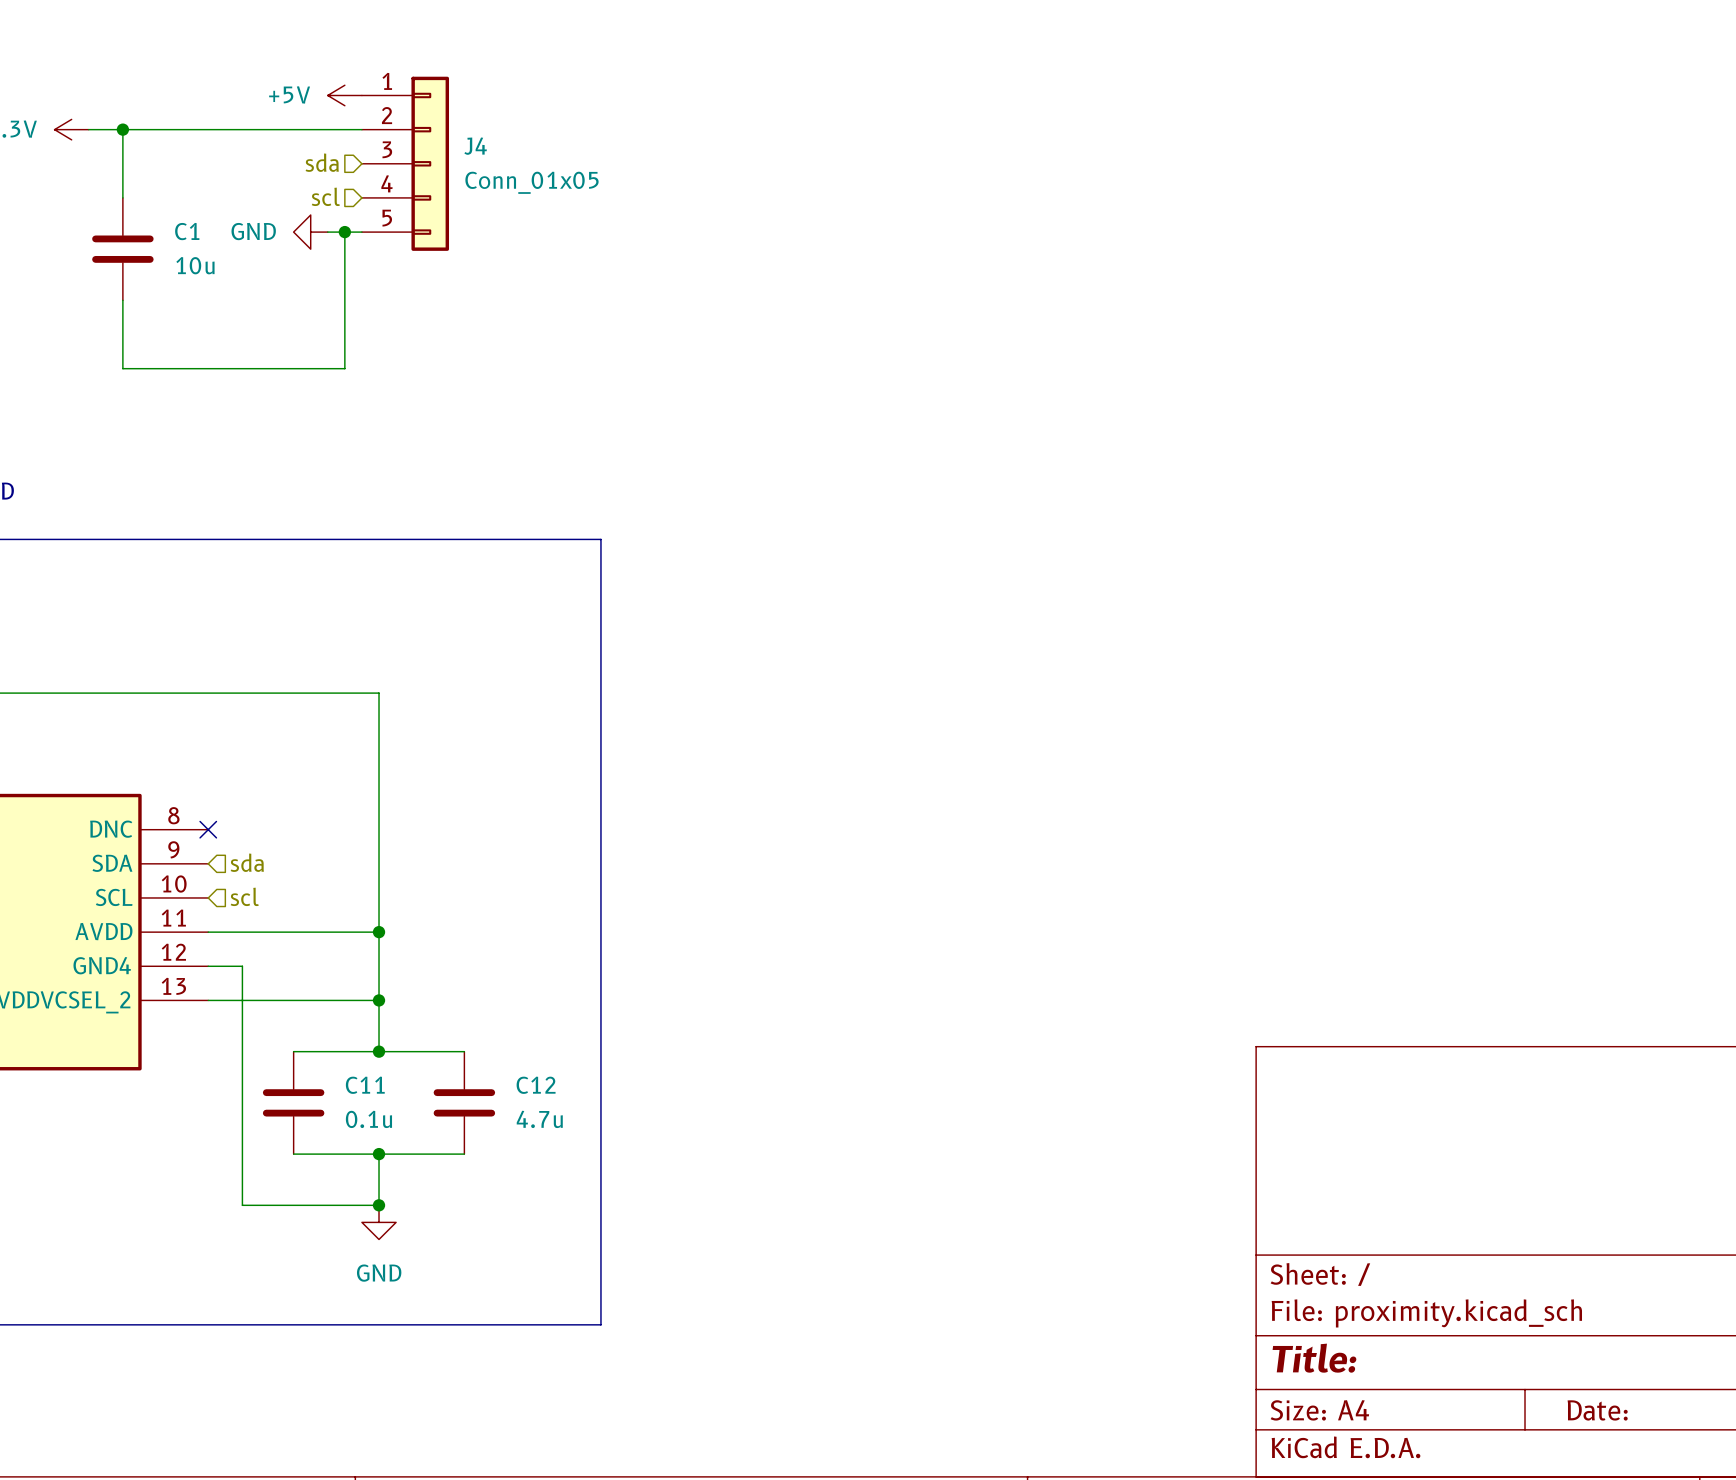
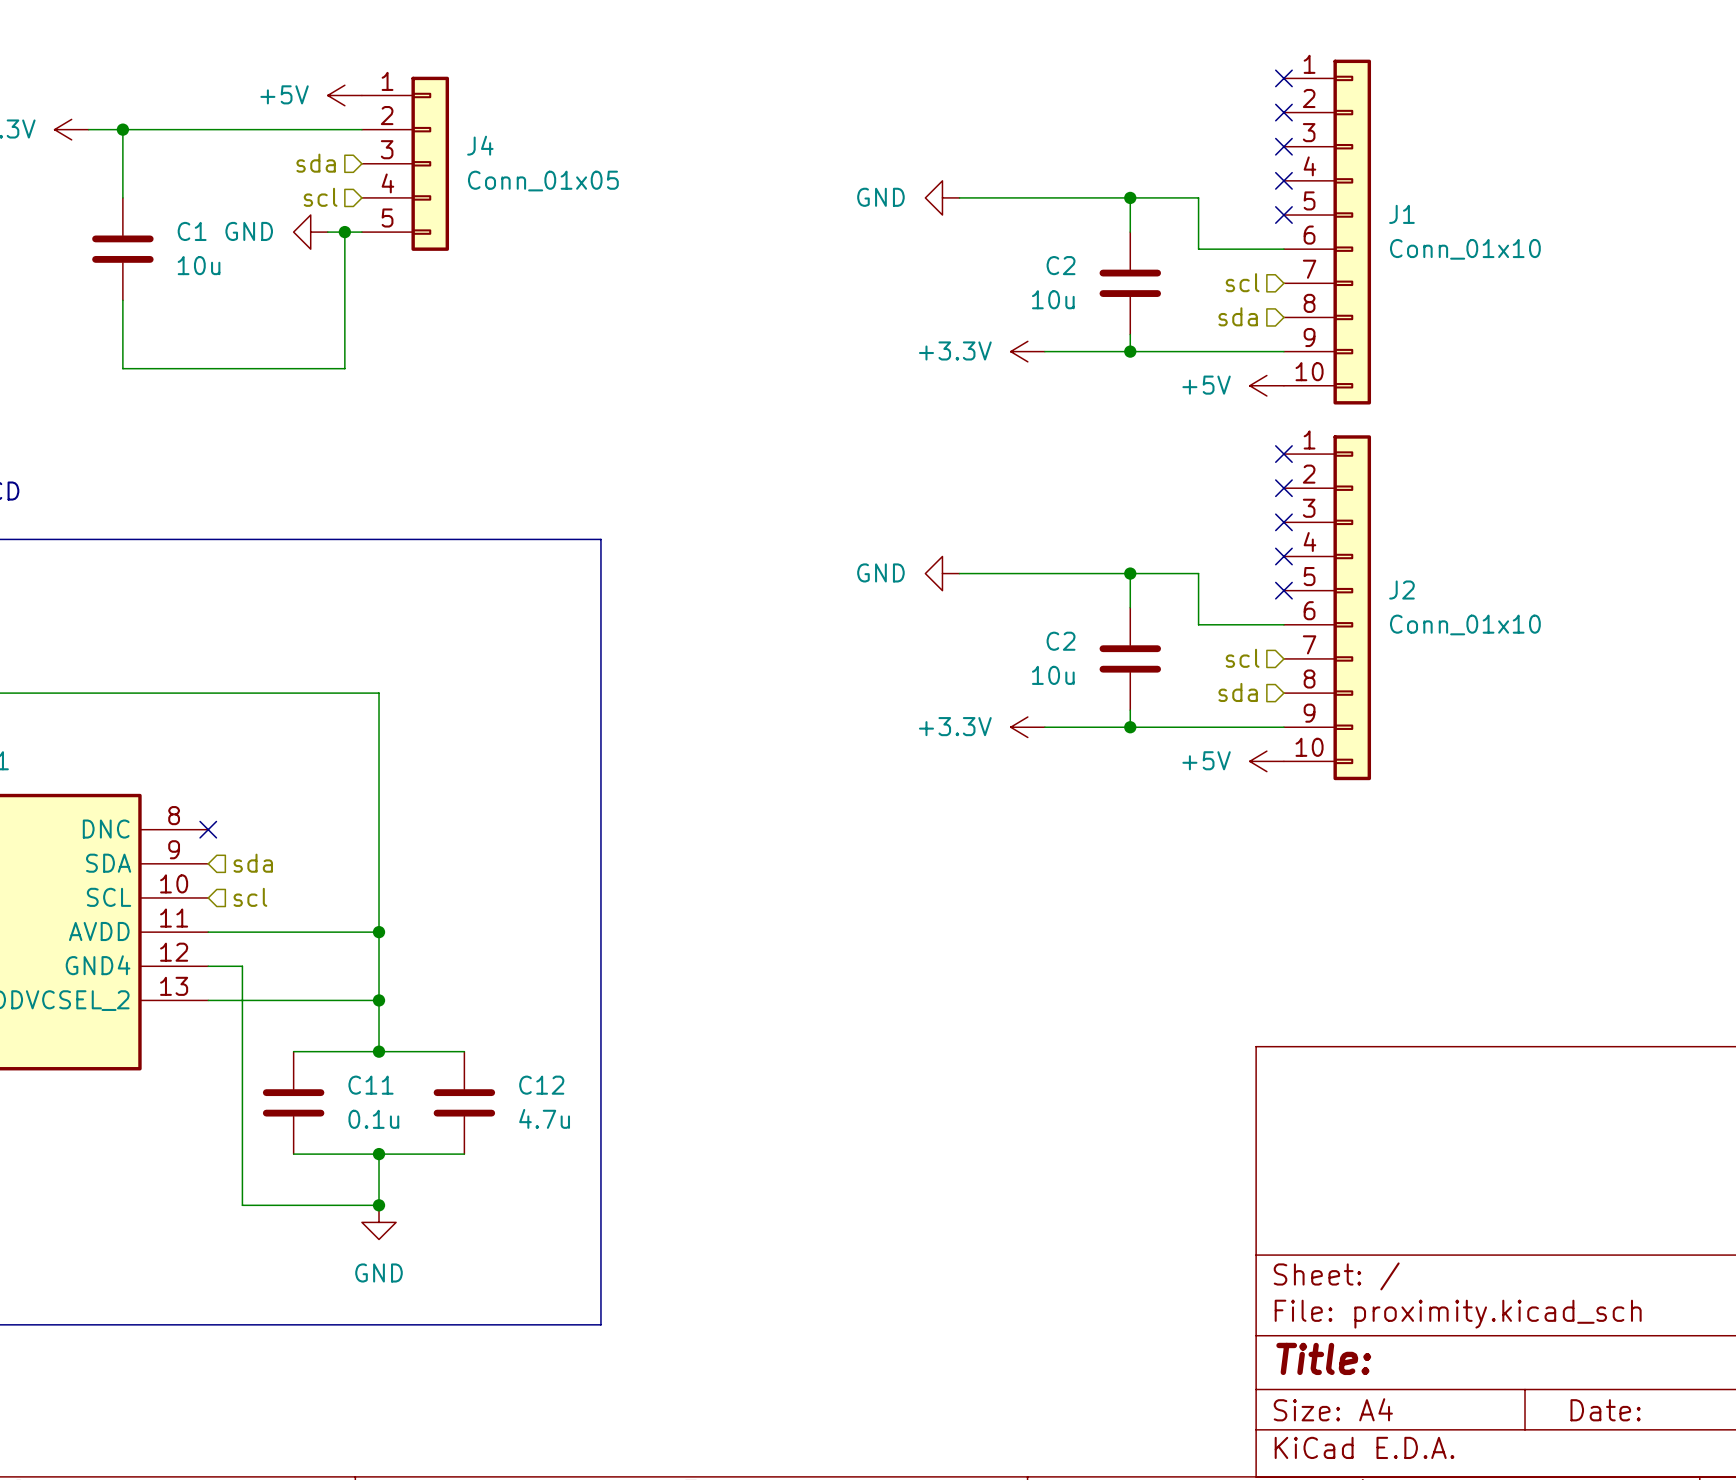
no-connect mark: none -> (1283, 78)
no-connect mark: none -> (1283, 112)
no-connect mark: none -> (1283, 146)
no-connect mark: none -> (1283, 180)
power symbol: none -> GND (942, 197)
wire: none -> (959, 197) (1198, 197) (1198, 249) (1283, 249)
wire: none -> (1130, 197) (1130, 232)
junction: none -> (1130, 197)
no-connect mark: none -> (1283, 215)
J1: none -> Conn_01x10 (1327, 232)
hierarchical label: none -> scl (1242, 282)
C2: none -> 10u (1130, 283)
hierarchical label: none -> sda (1238, 316)
wire: none -> (1130, 334) (1130, 351)
power symbol: none -> +3.3V (1027, 351)
wire: none -> (1044, 351) (1283, 351)
junction: none -> (1130, 351)
power symbol: none -> +5V (1266, 385)
no-connect mark: none -> (1283, 454)
no-connect mark: none -> (1283, 488)
no-connect mark: none -> (1283, 522)
no-connect mark: none -> (1283, 556)
power symbol: none -> GND (942, 573)
wire: none -> (959, 573) (1198, 573) (1198, 624) (1283, 624)
wire: none -> (1130, 573) (1130, 607)
junction: none -> (1130, 573)
no-connect mark: none -> (1283, 590)
J2: none -> Conn_01x10 (1327, 607)
hierarchical label: none -> scl (1242, 658)
C2: none -> 10u (1130, 658)
hierarchical label: none -> sda (1238, 692)
wire: none -> (1130, 710) (1130, 727)
power symbol: none -> +3.3V (1027, 727)
wire: none -> (1044, 727) (1283, 727)
junction: none -> (1130, 727)
power symbol: none -> +5V (1266, 761)

